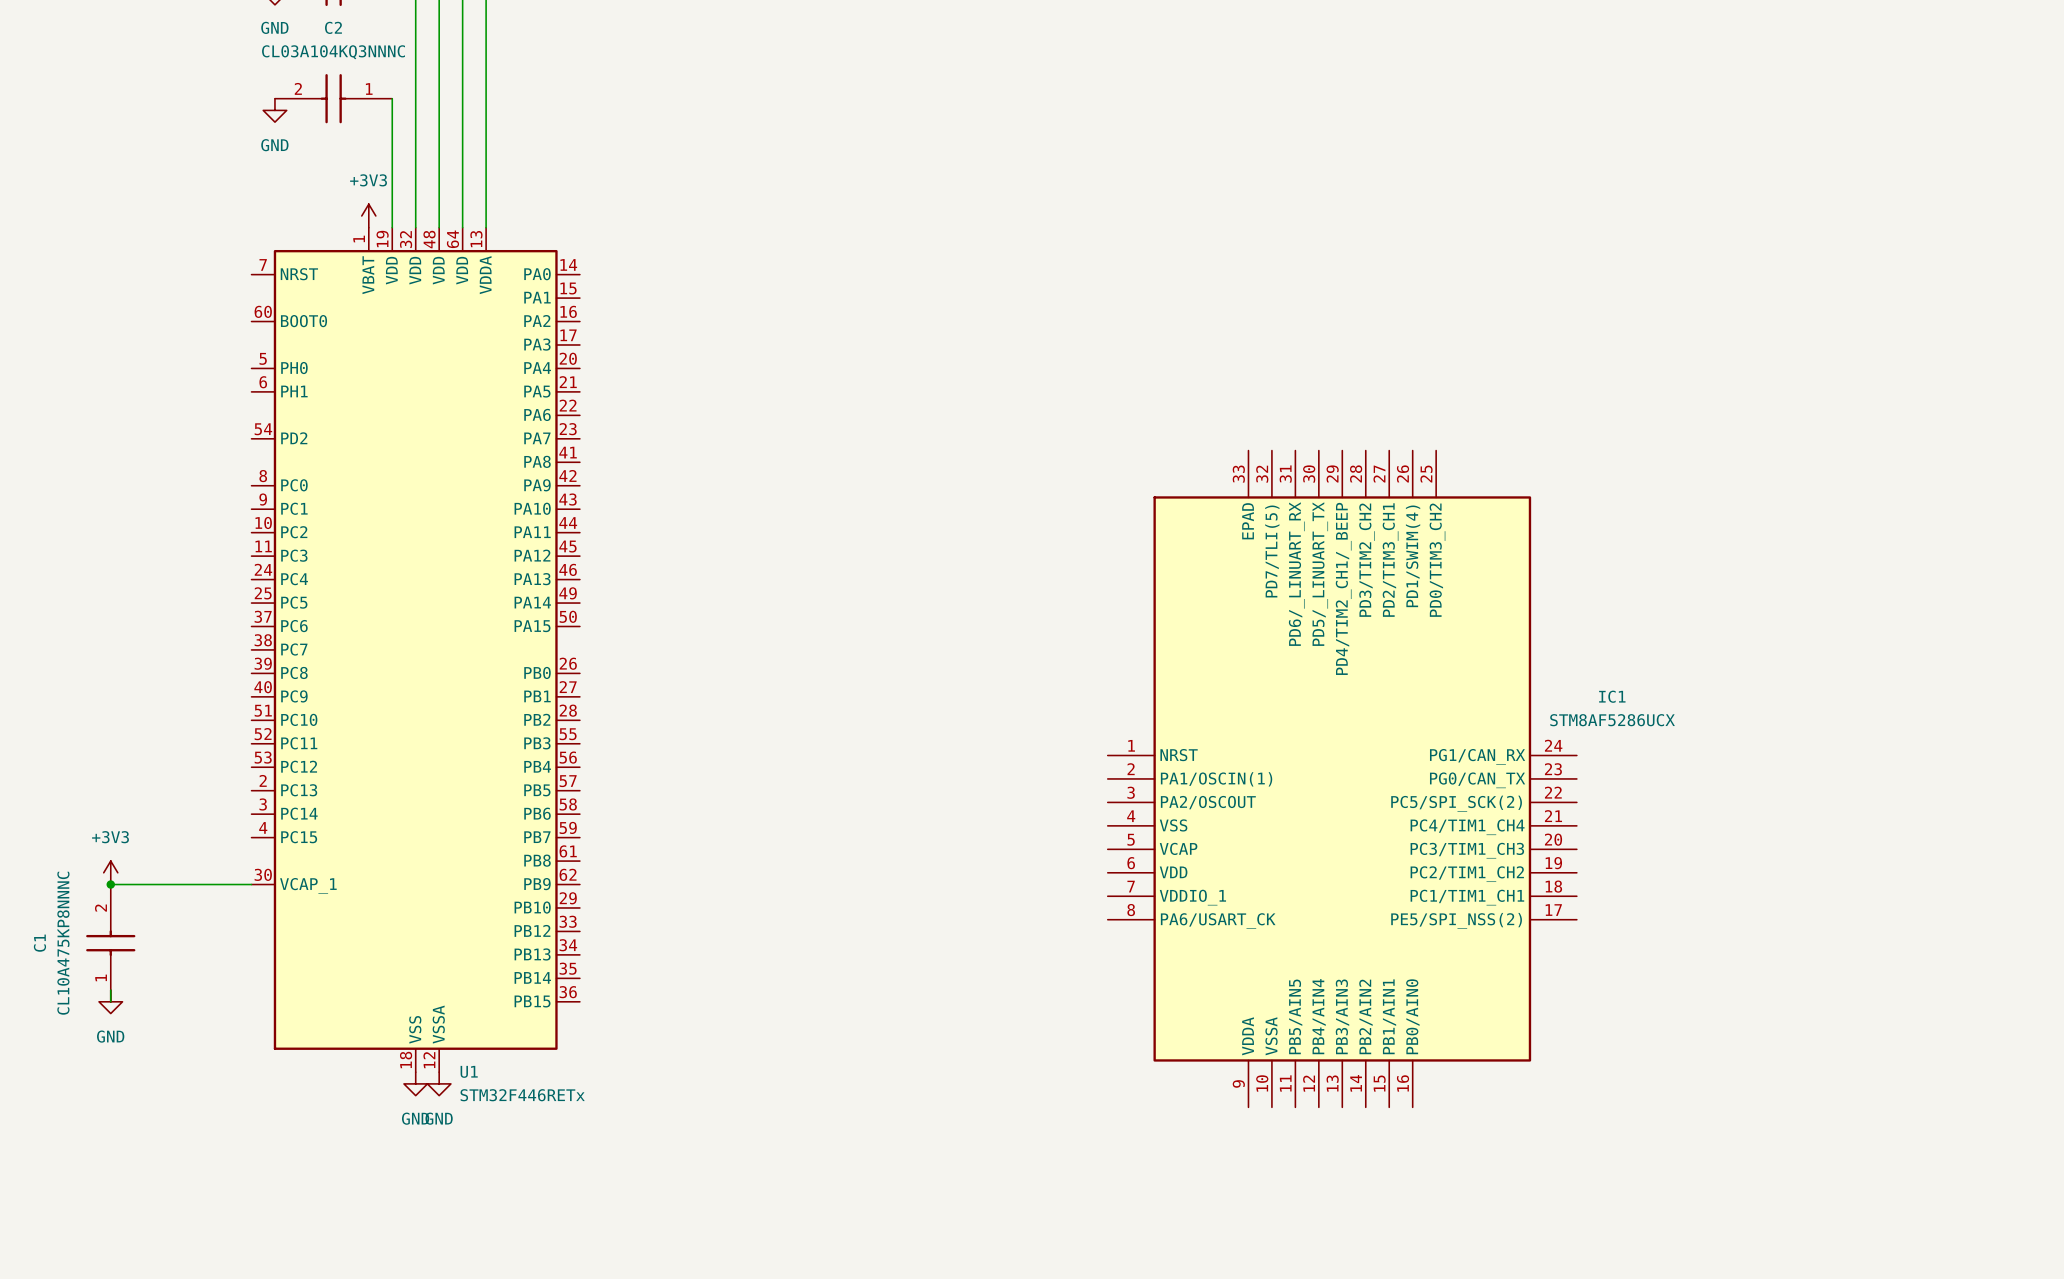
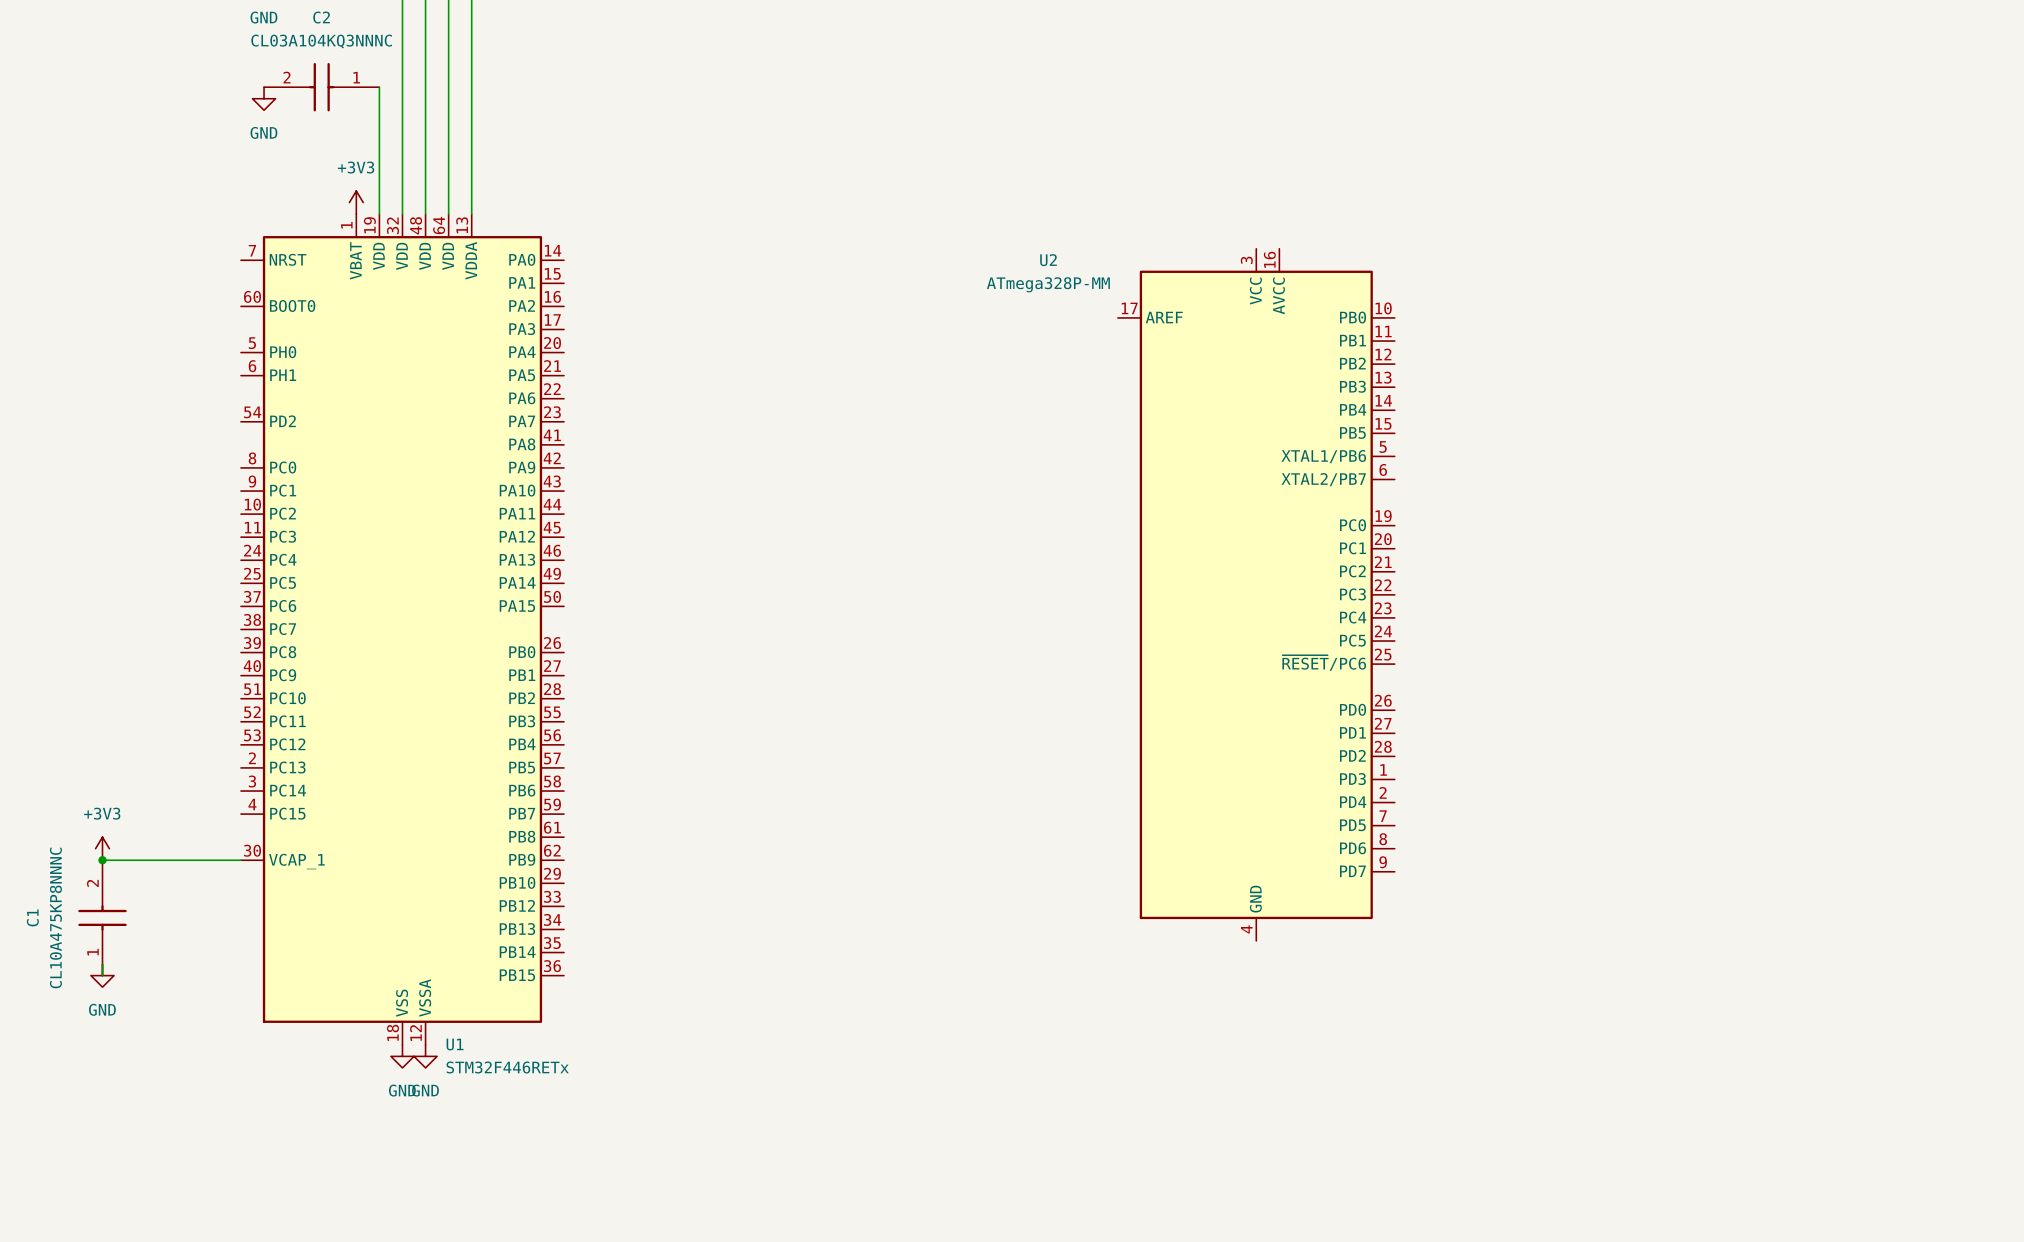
U2: none -> ATmega328P-MM (1256, 594)
IC1: STM8AF5286UCX (1342, 778) -> none

